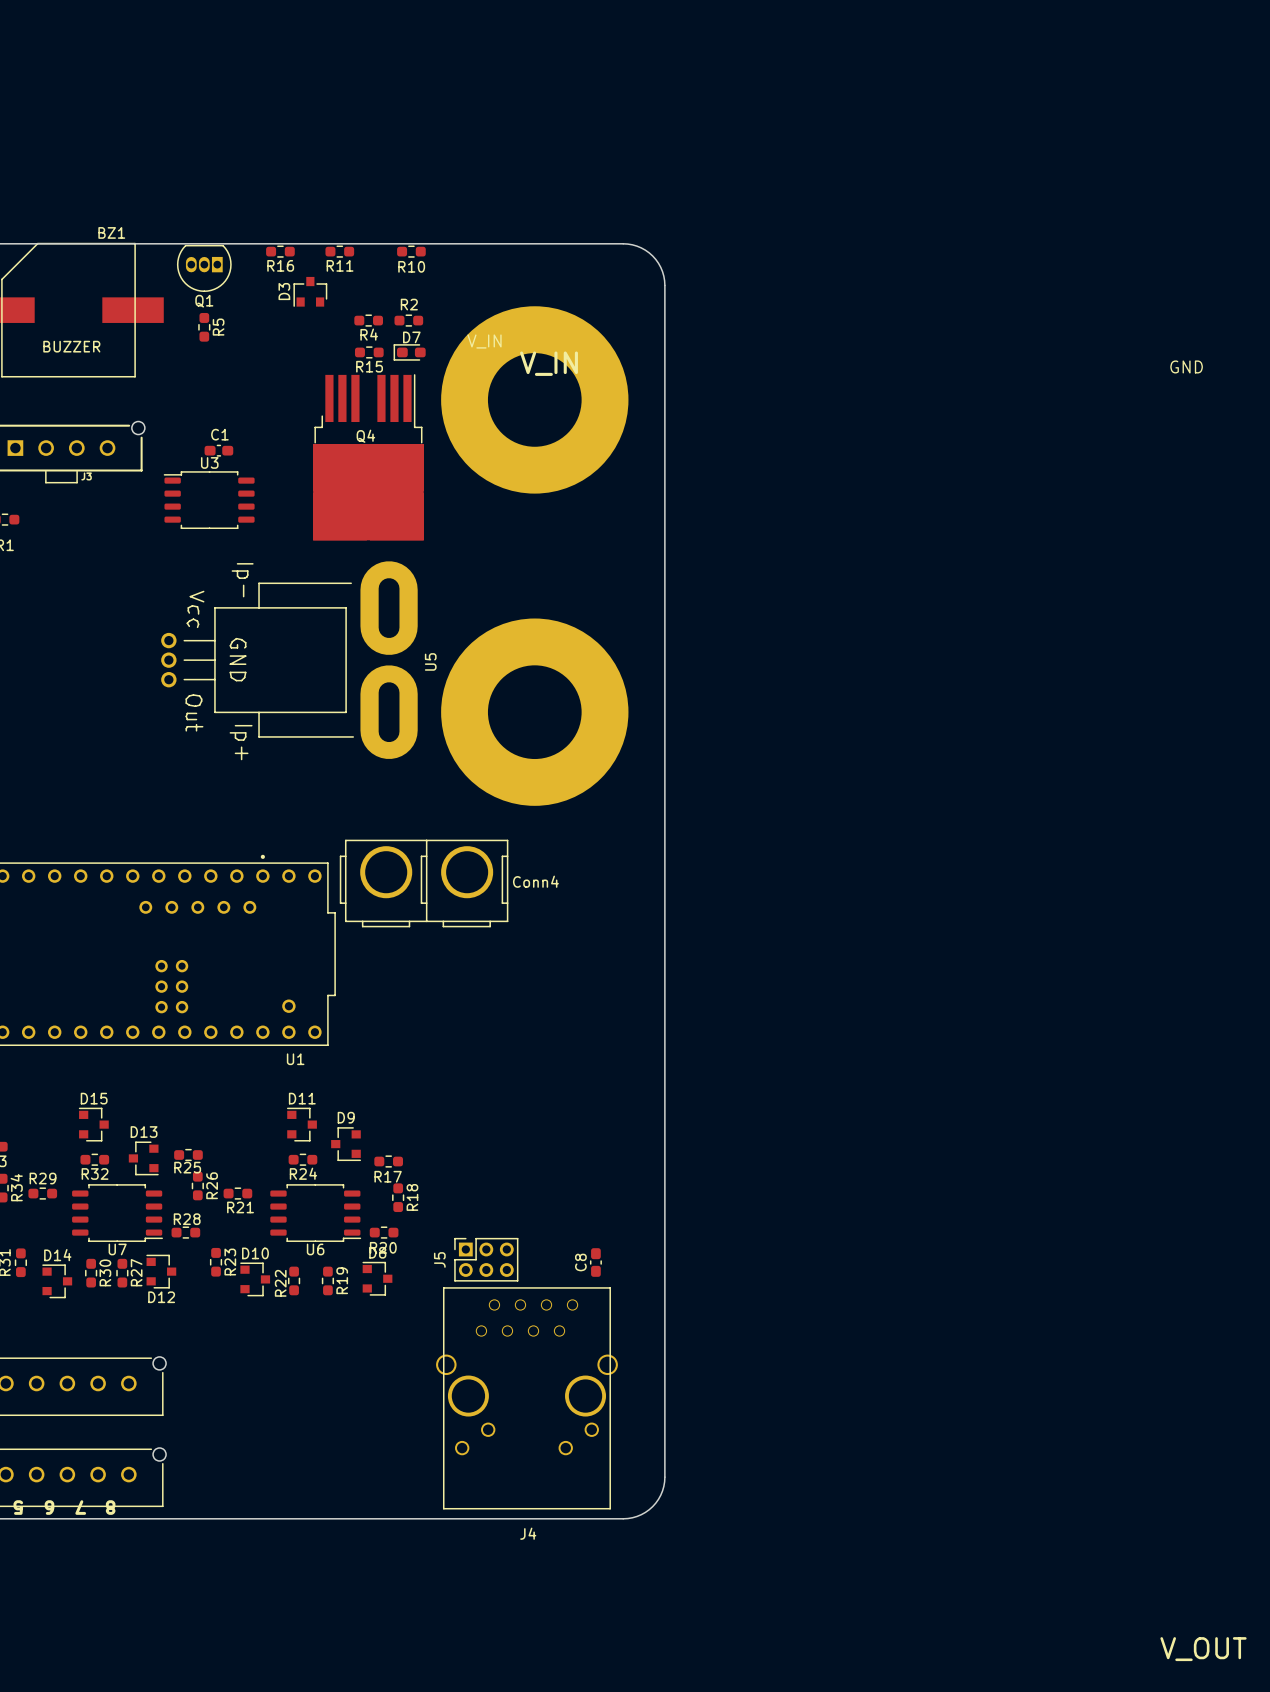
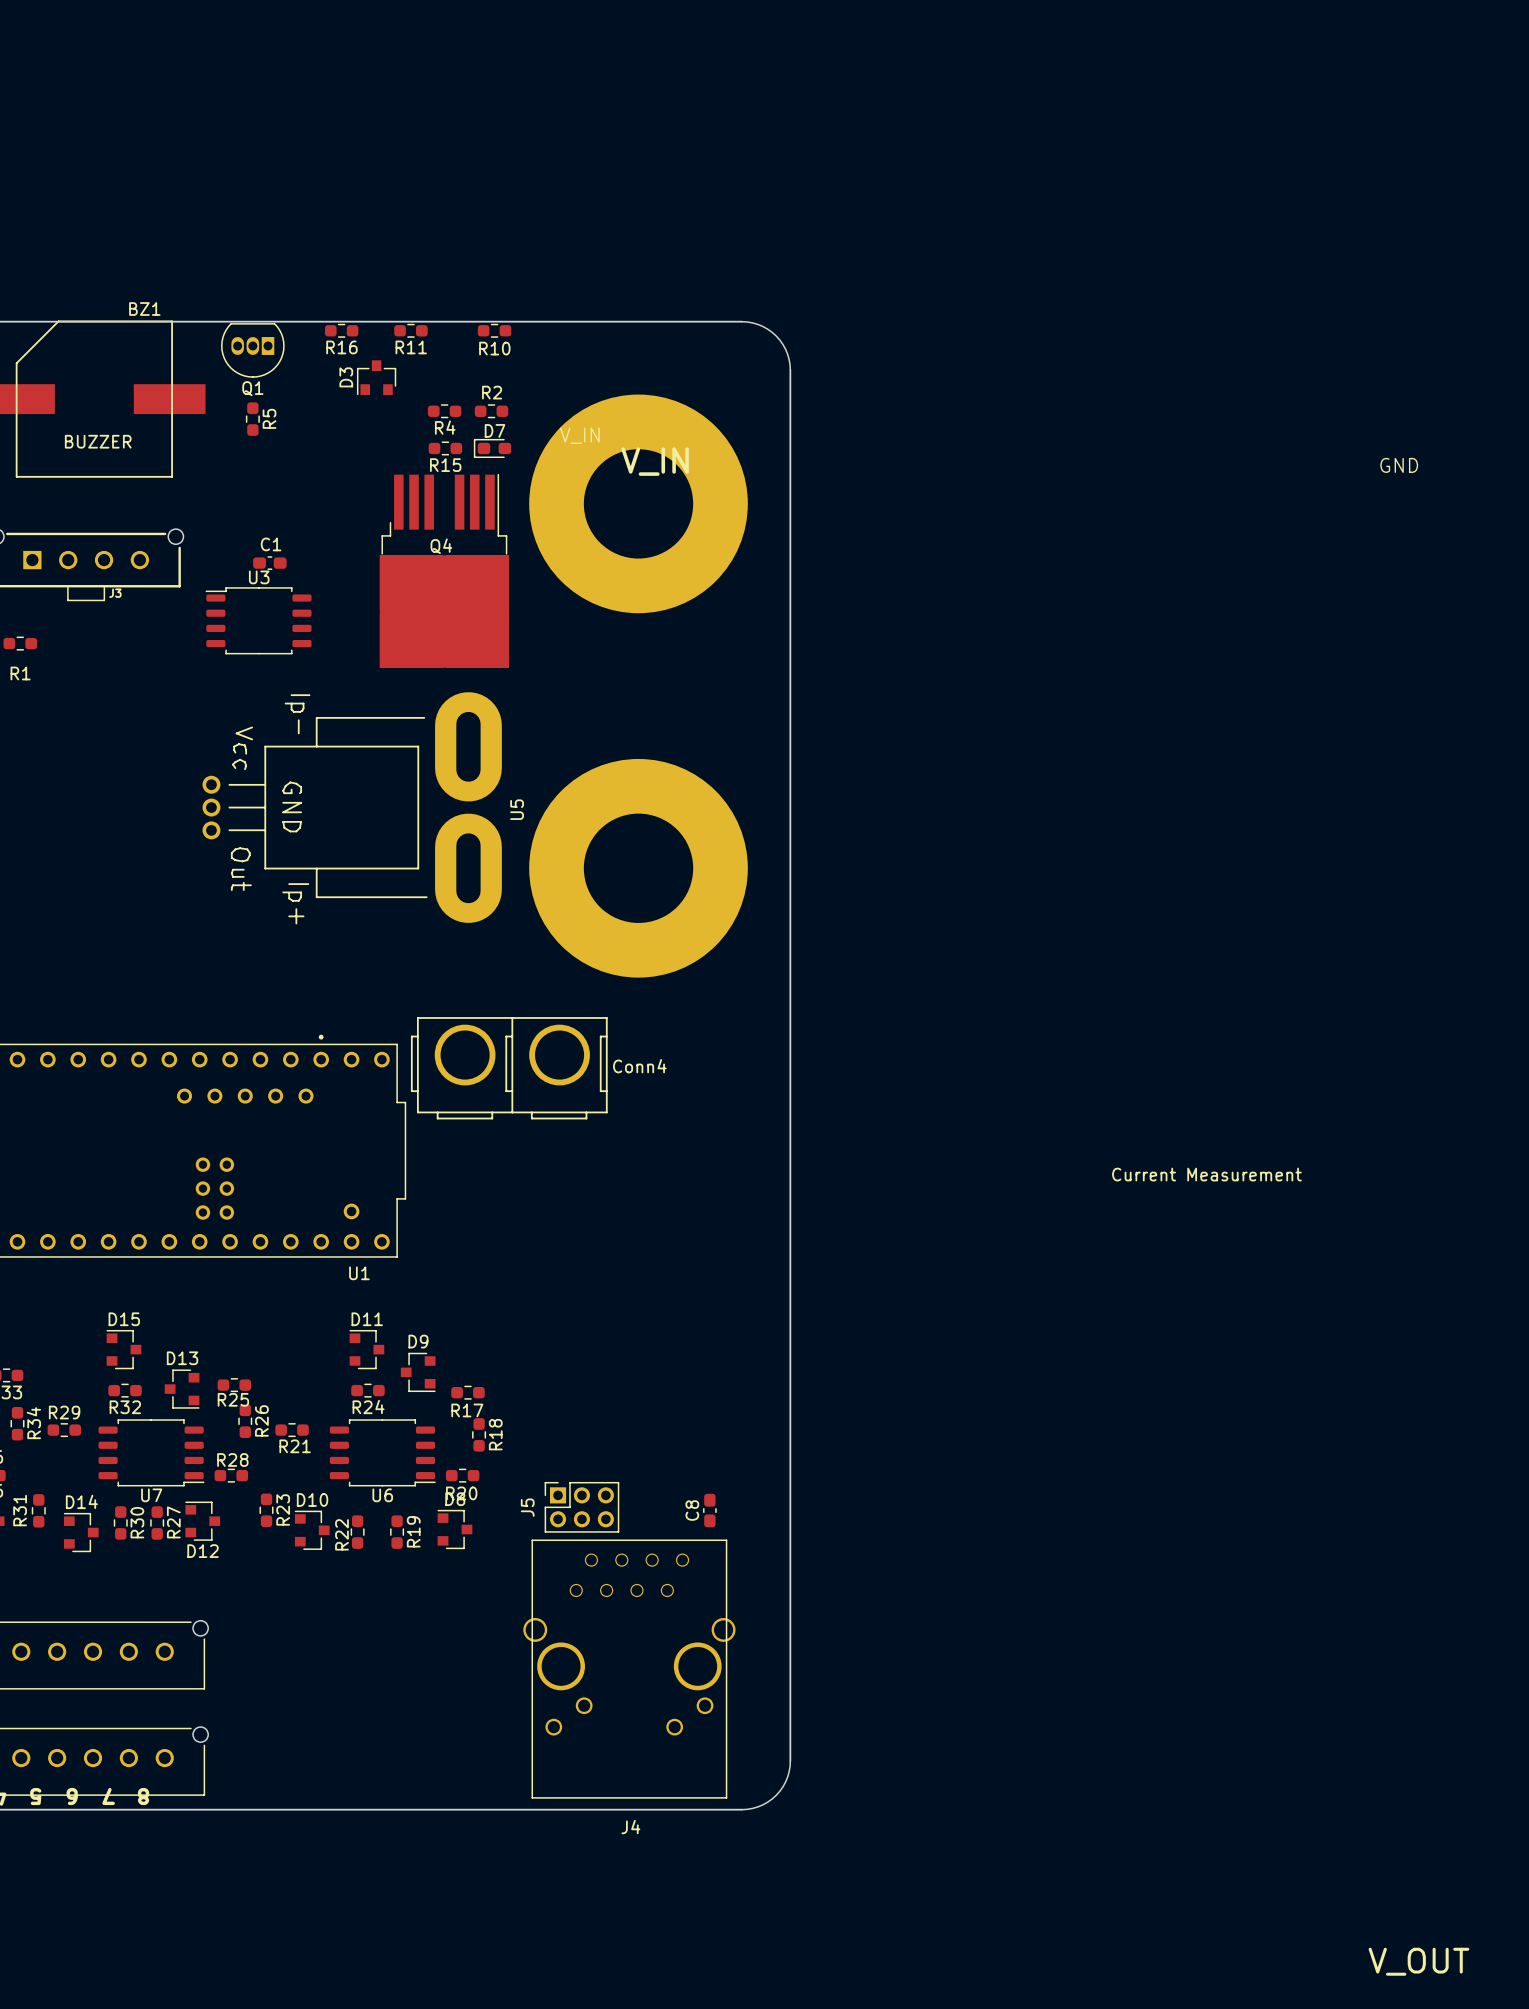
text: none -> Current Measurement (1206, 1174)

